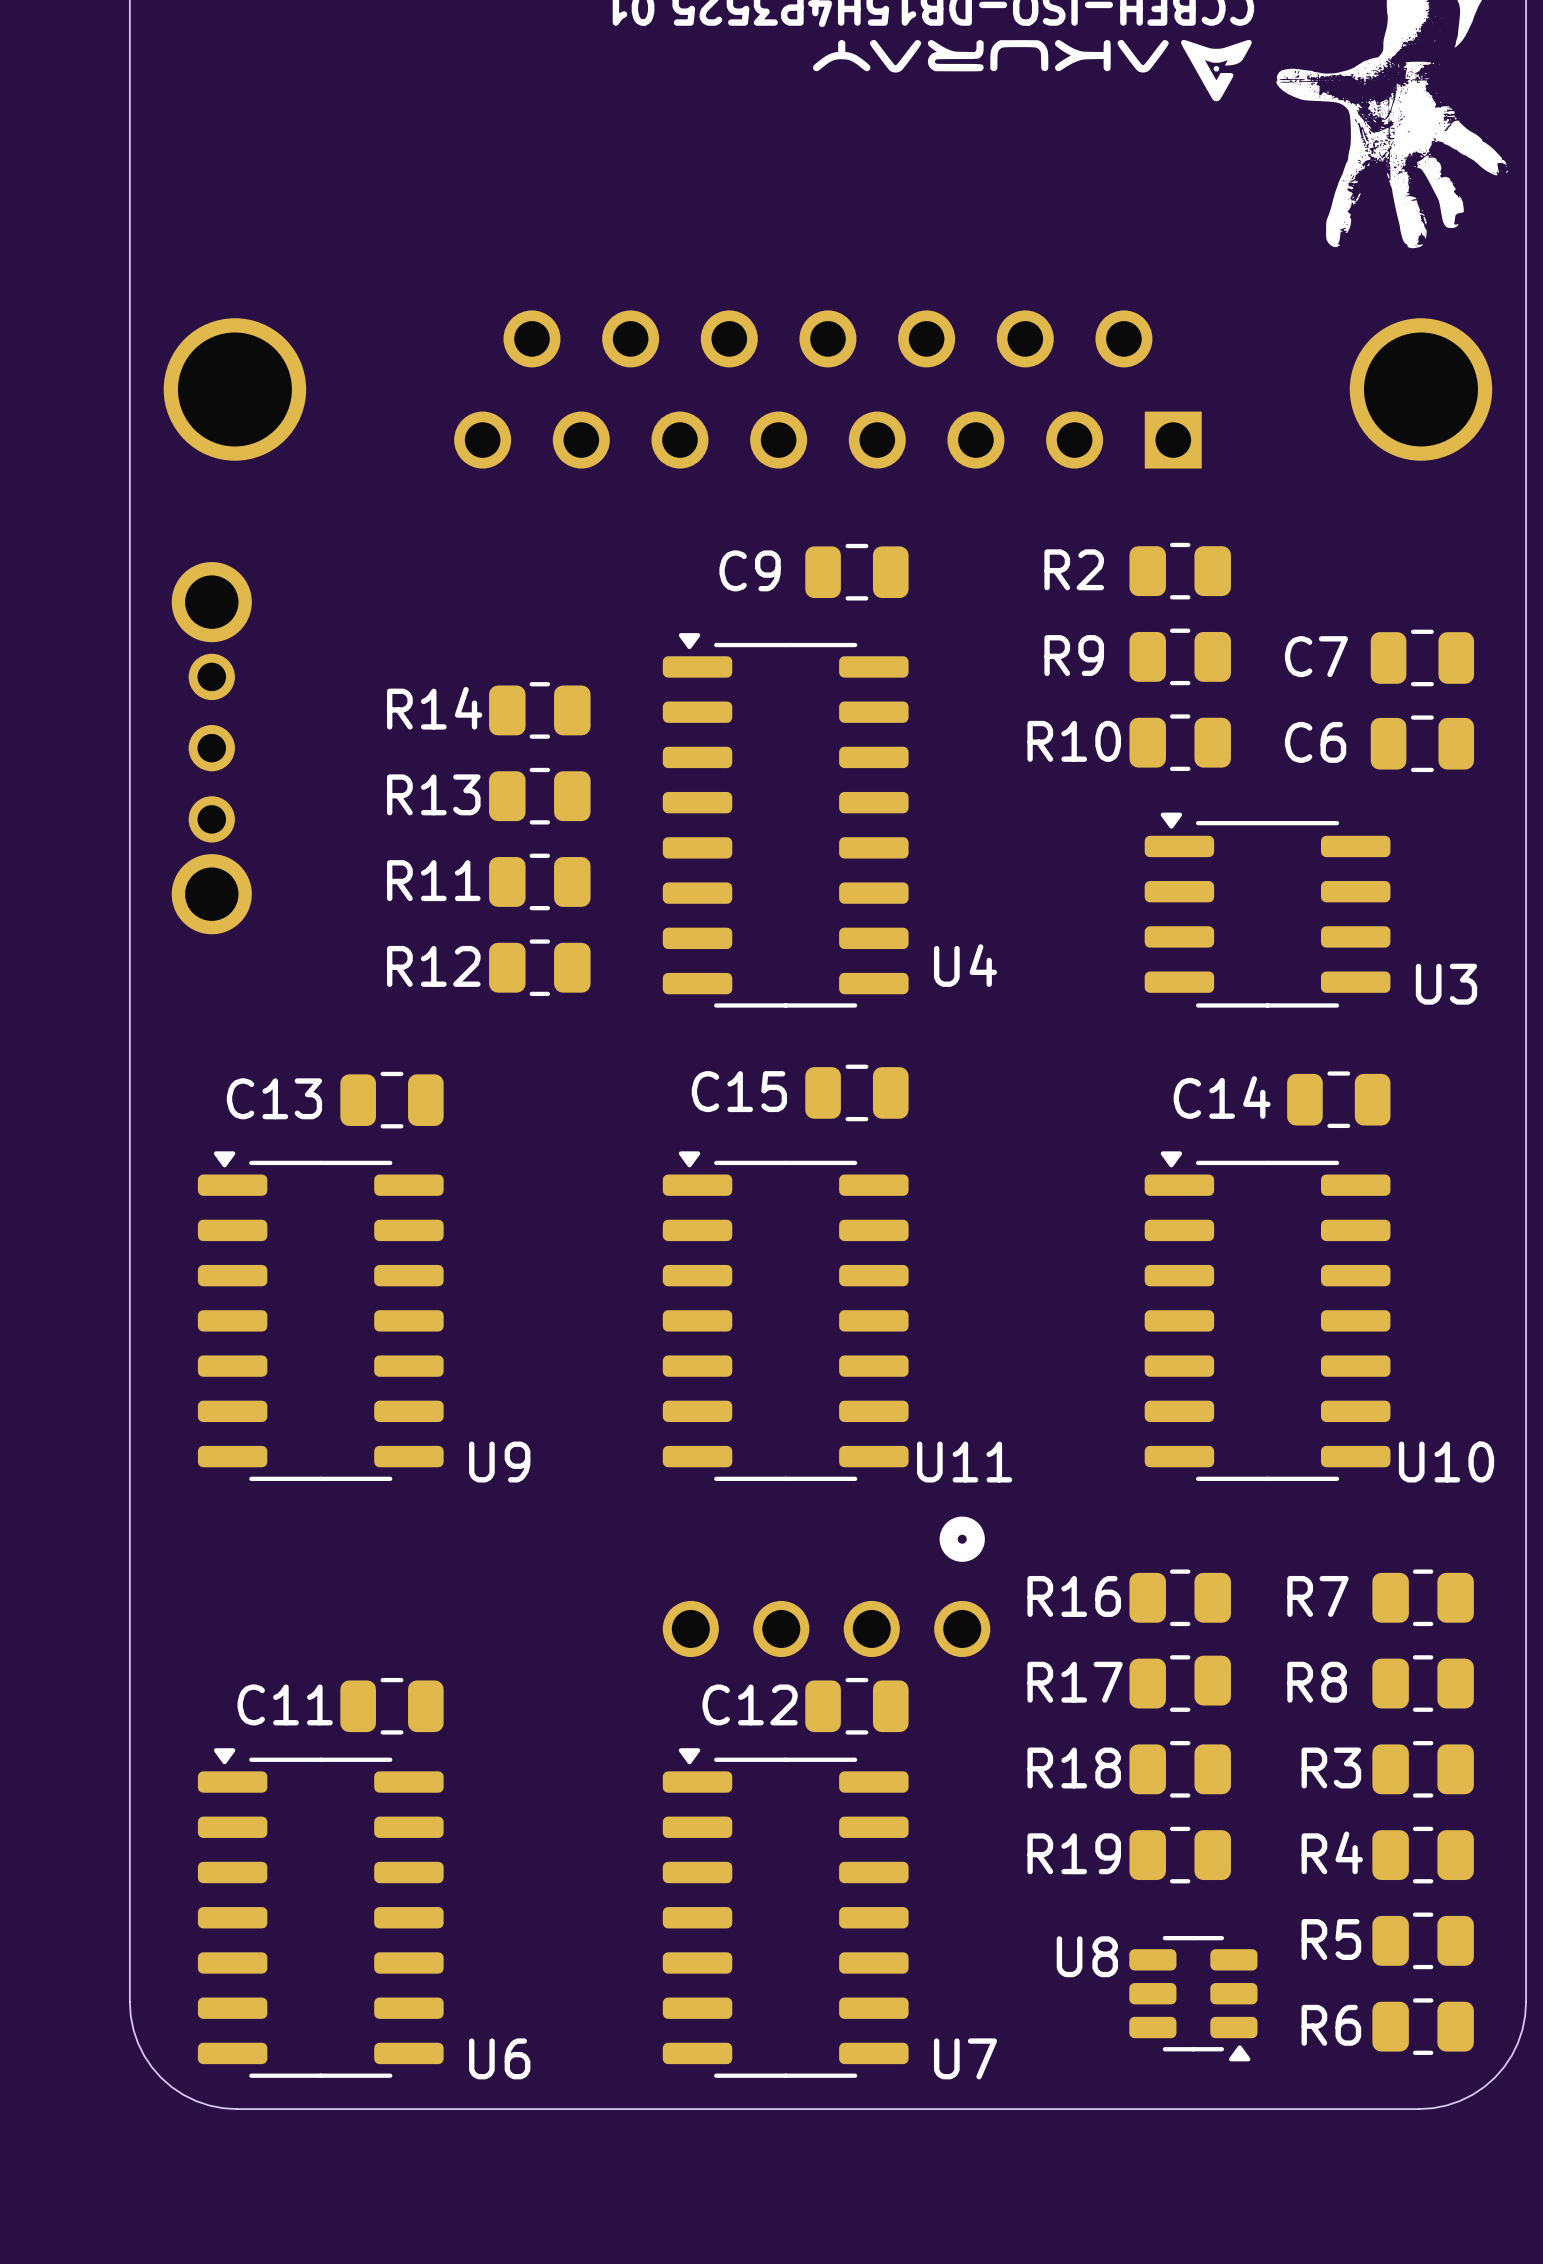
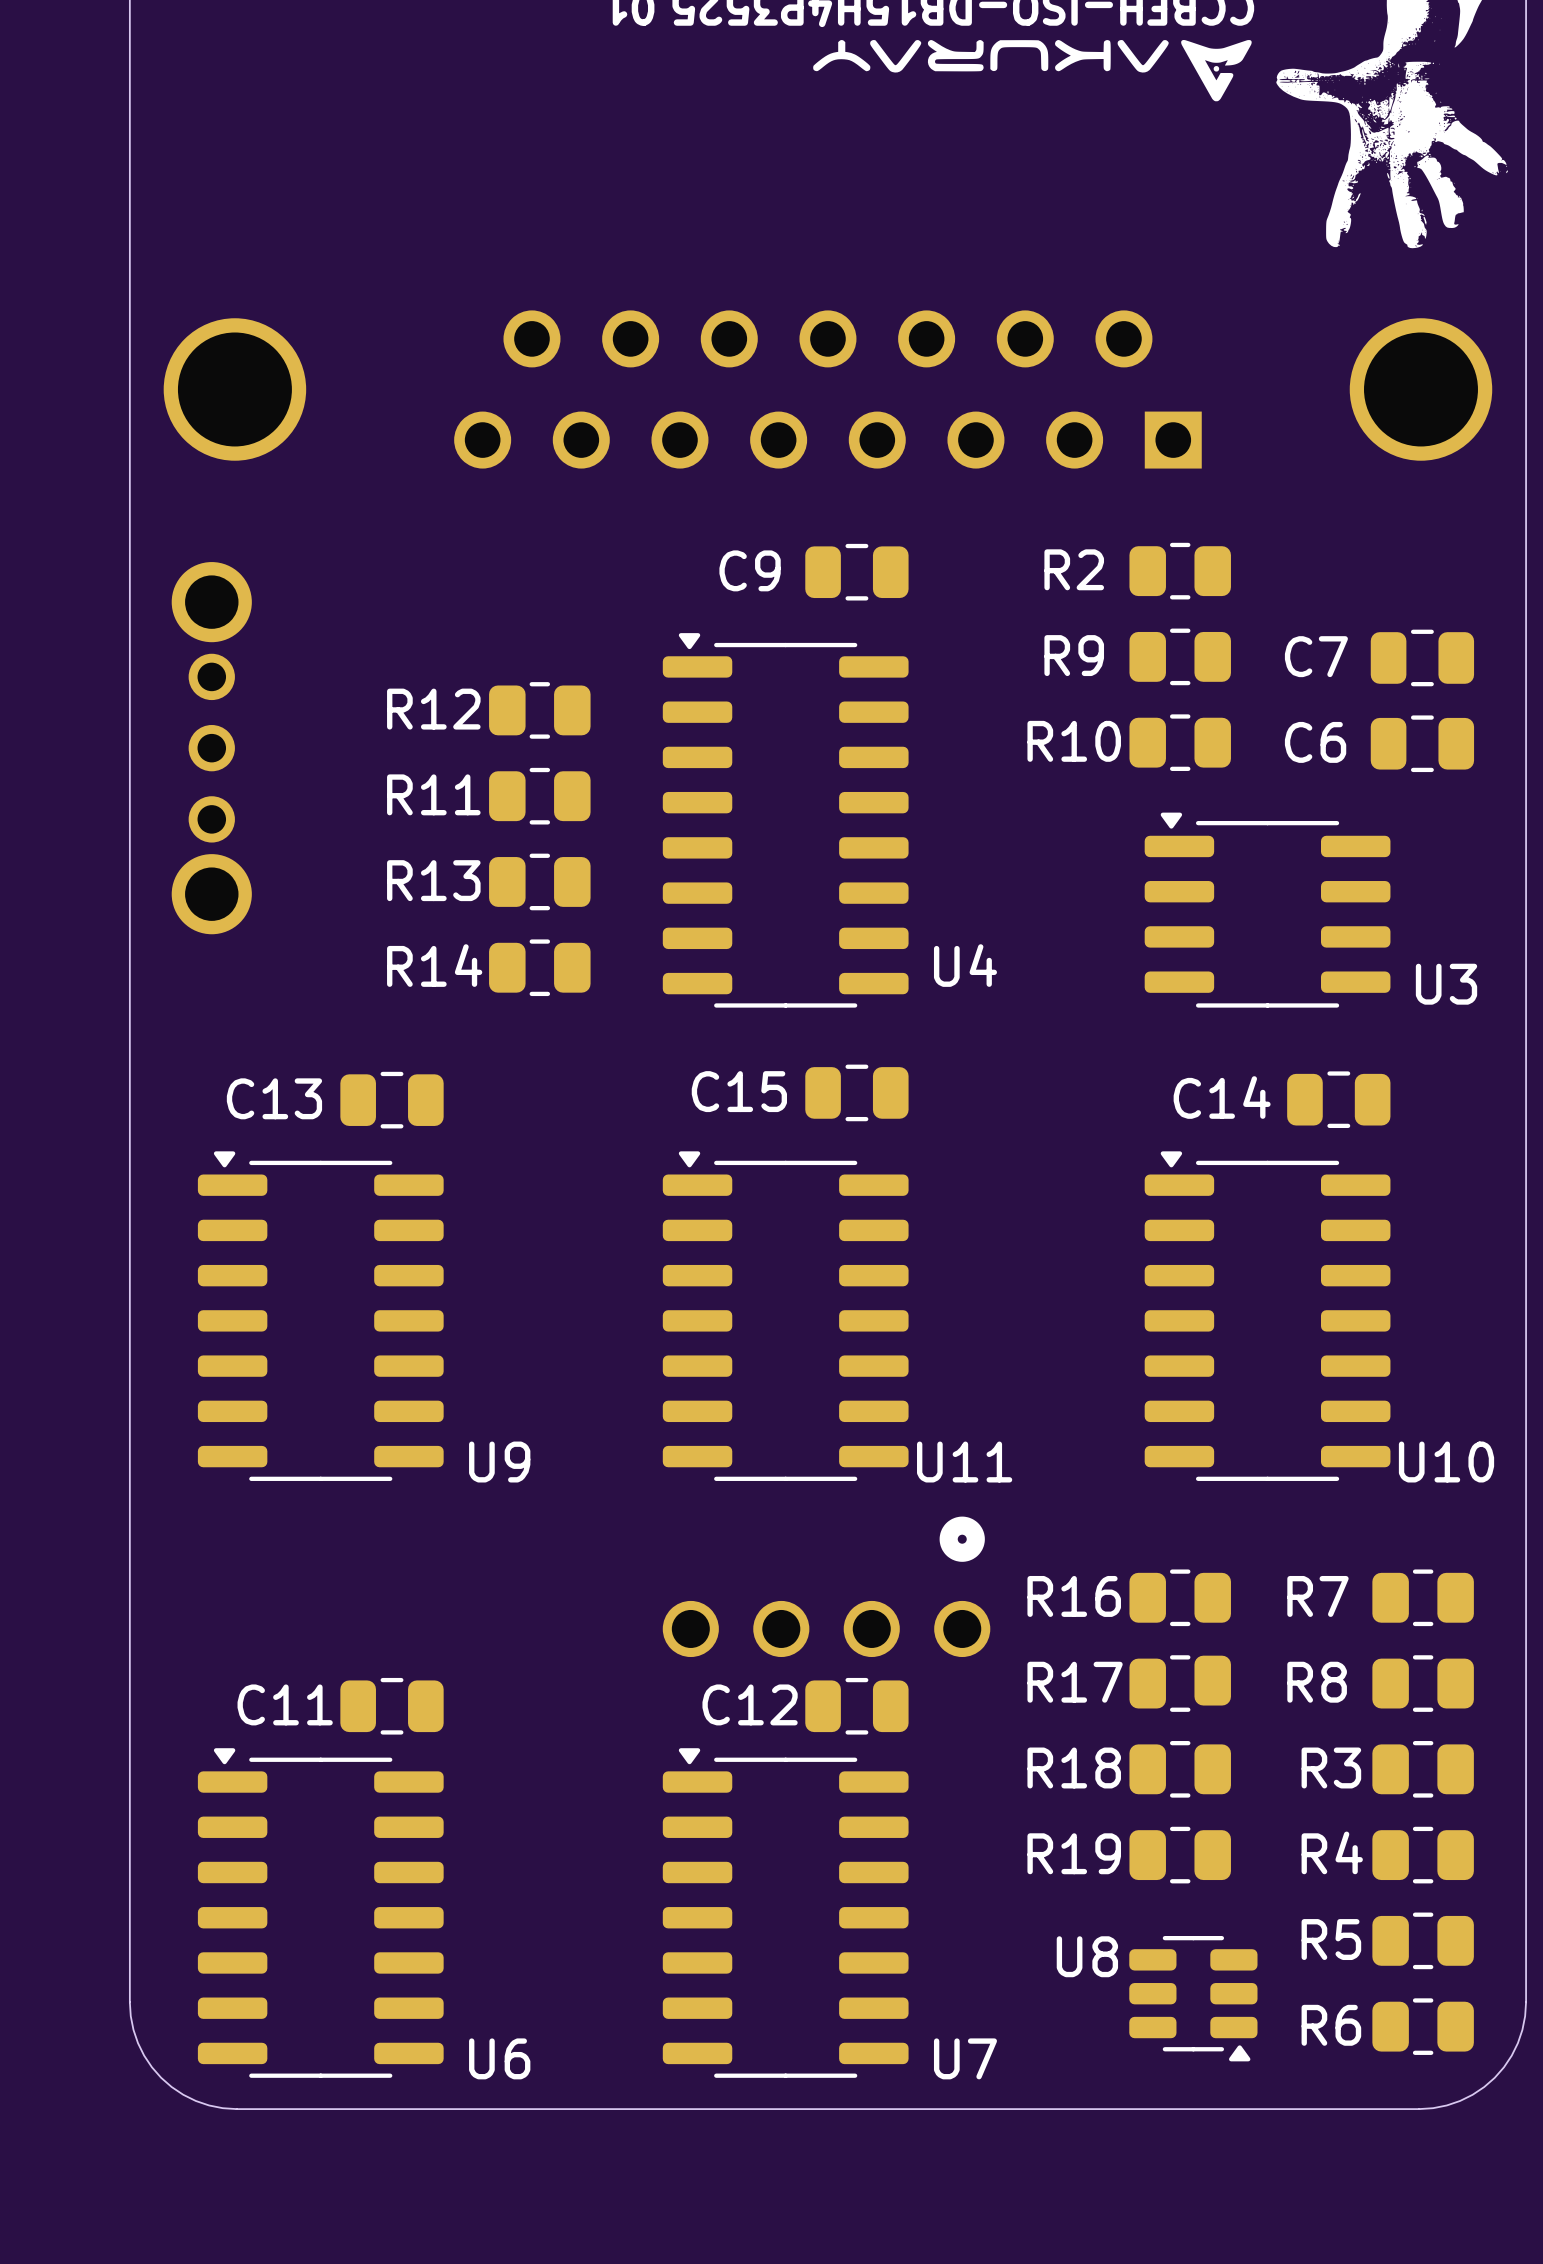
R14 name: R14 (434, 708) -> R12 (433, 709)
R13 name: R13 (433, 794) -> R11 (433, 794)
R11 name: R11 (433, 880) -> R13 (433, 880)
R12 name: R12 (433, 966) -> R14 (434, 965)

